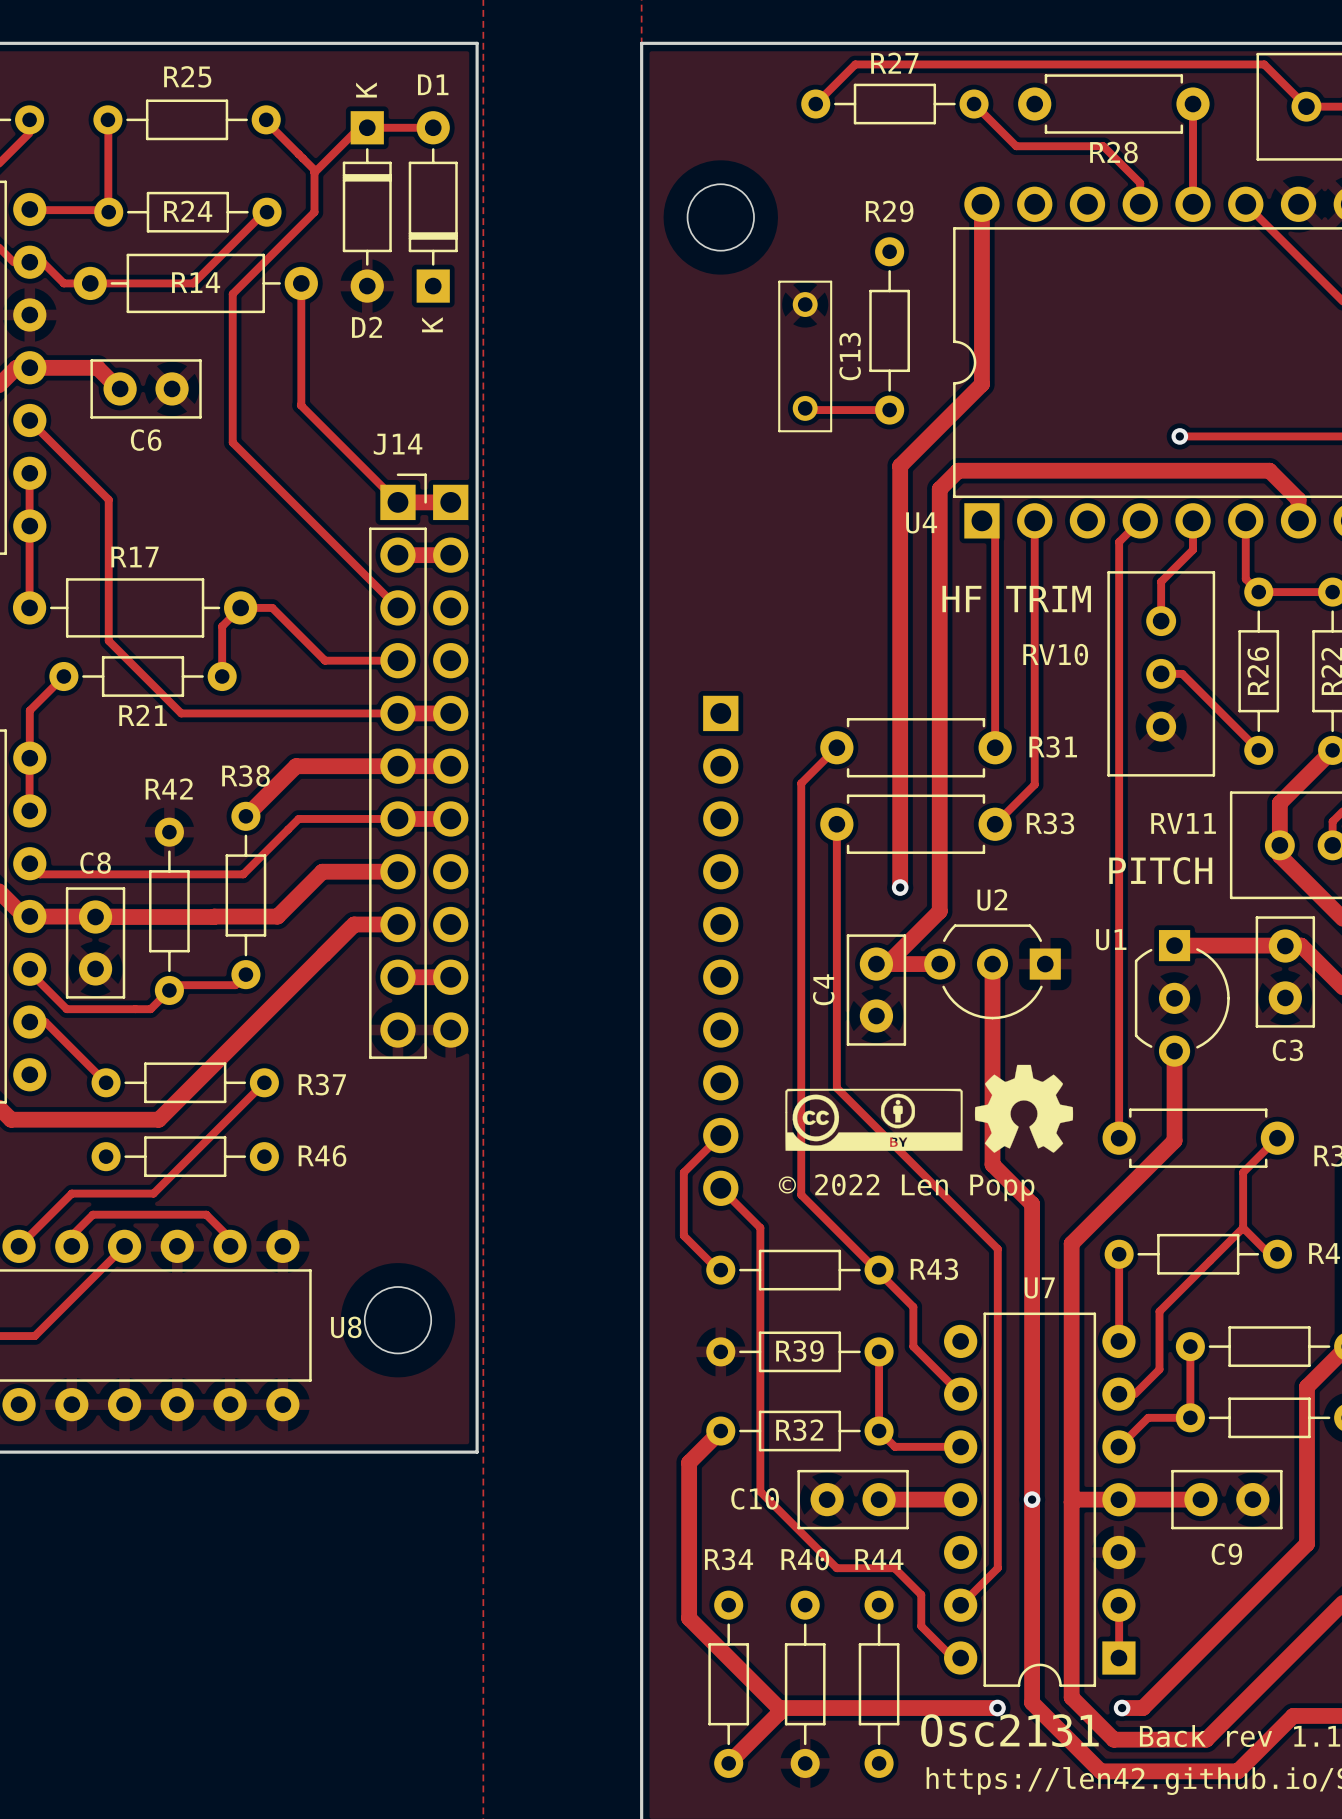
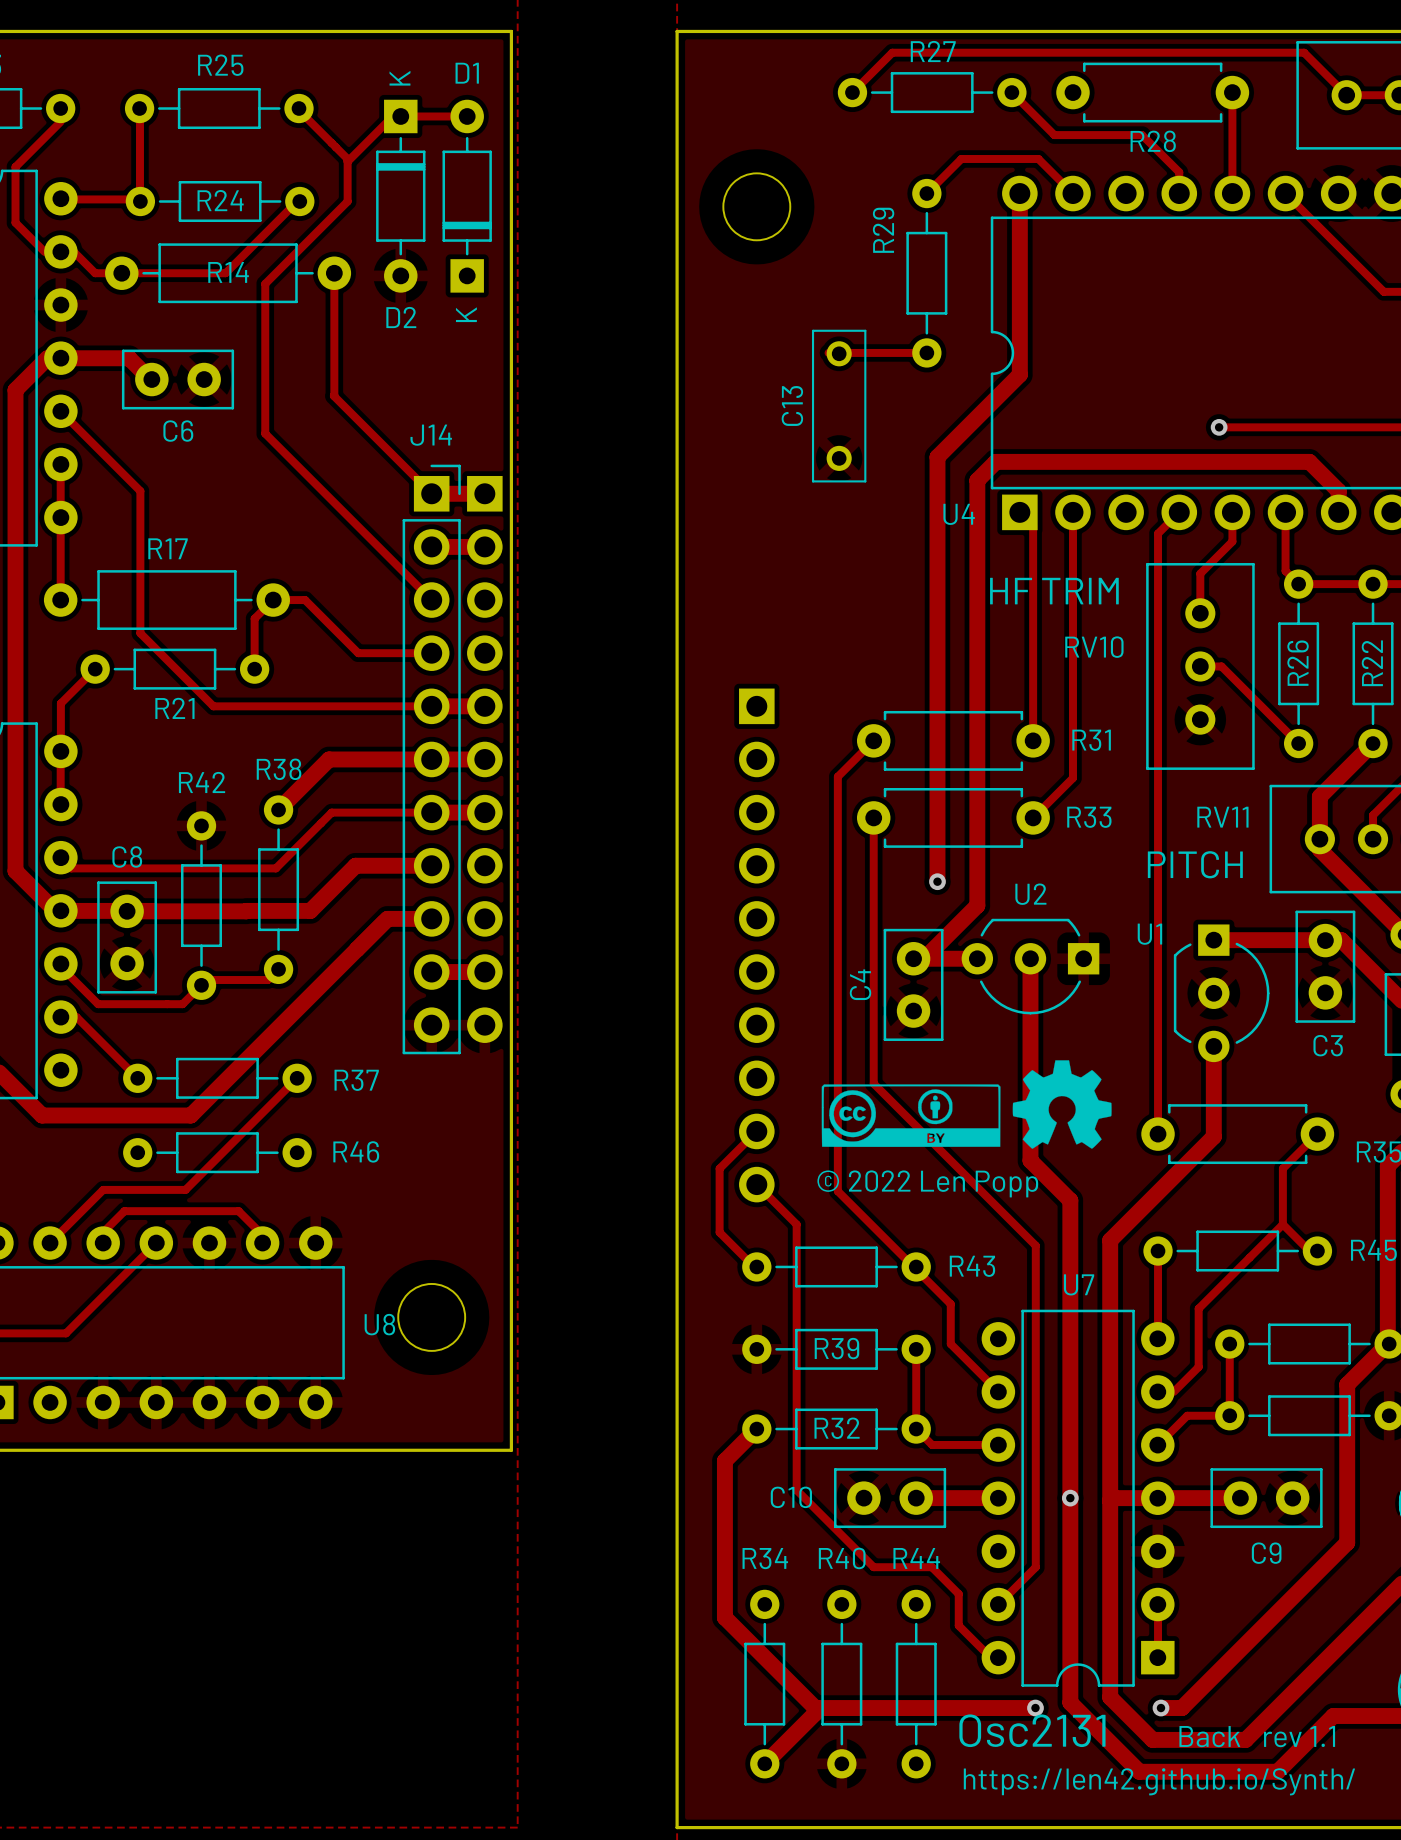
track: none -> (926, 193) (961, 158) (1038, 158) (1072, 193)
R29 name rotation: 0° (889, 211) -> 90° counterclockwise (883, 230)
R29 position: (889, 330) -> (926, 273)
C13 position: (805, 356) -> (839, 406)
C13 name position: C13 (850, 356) -> C13 (792, 405)
track: none -> (828, 352) (926, 352)
track: (805, 408) (806, 410) (889, 410) -> none

